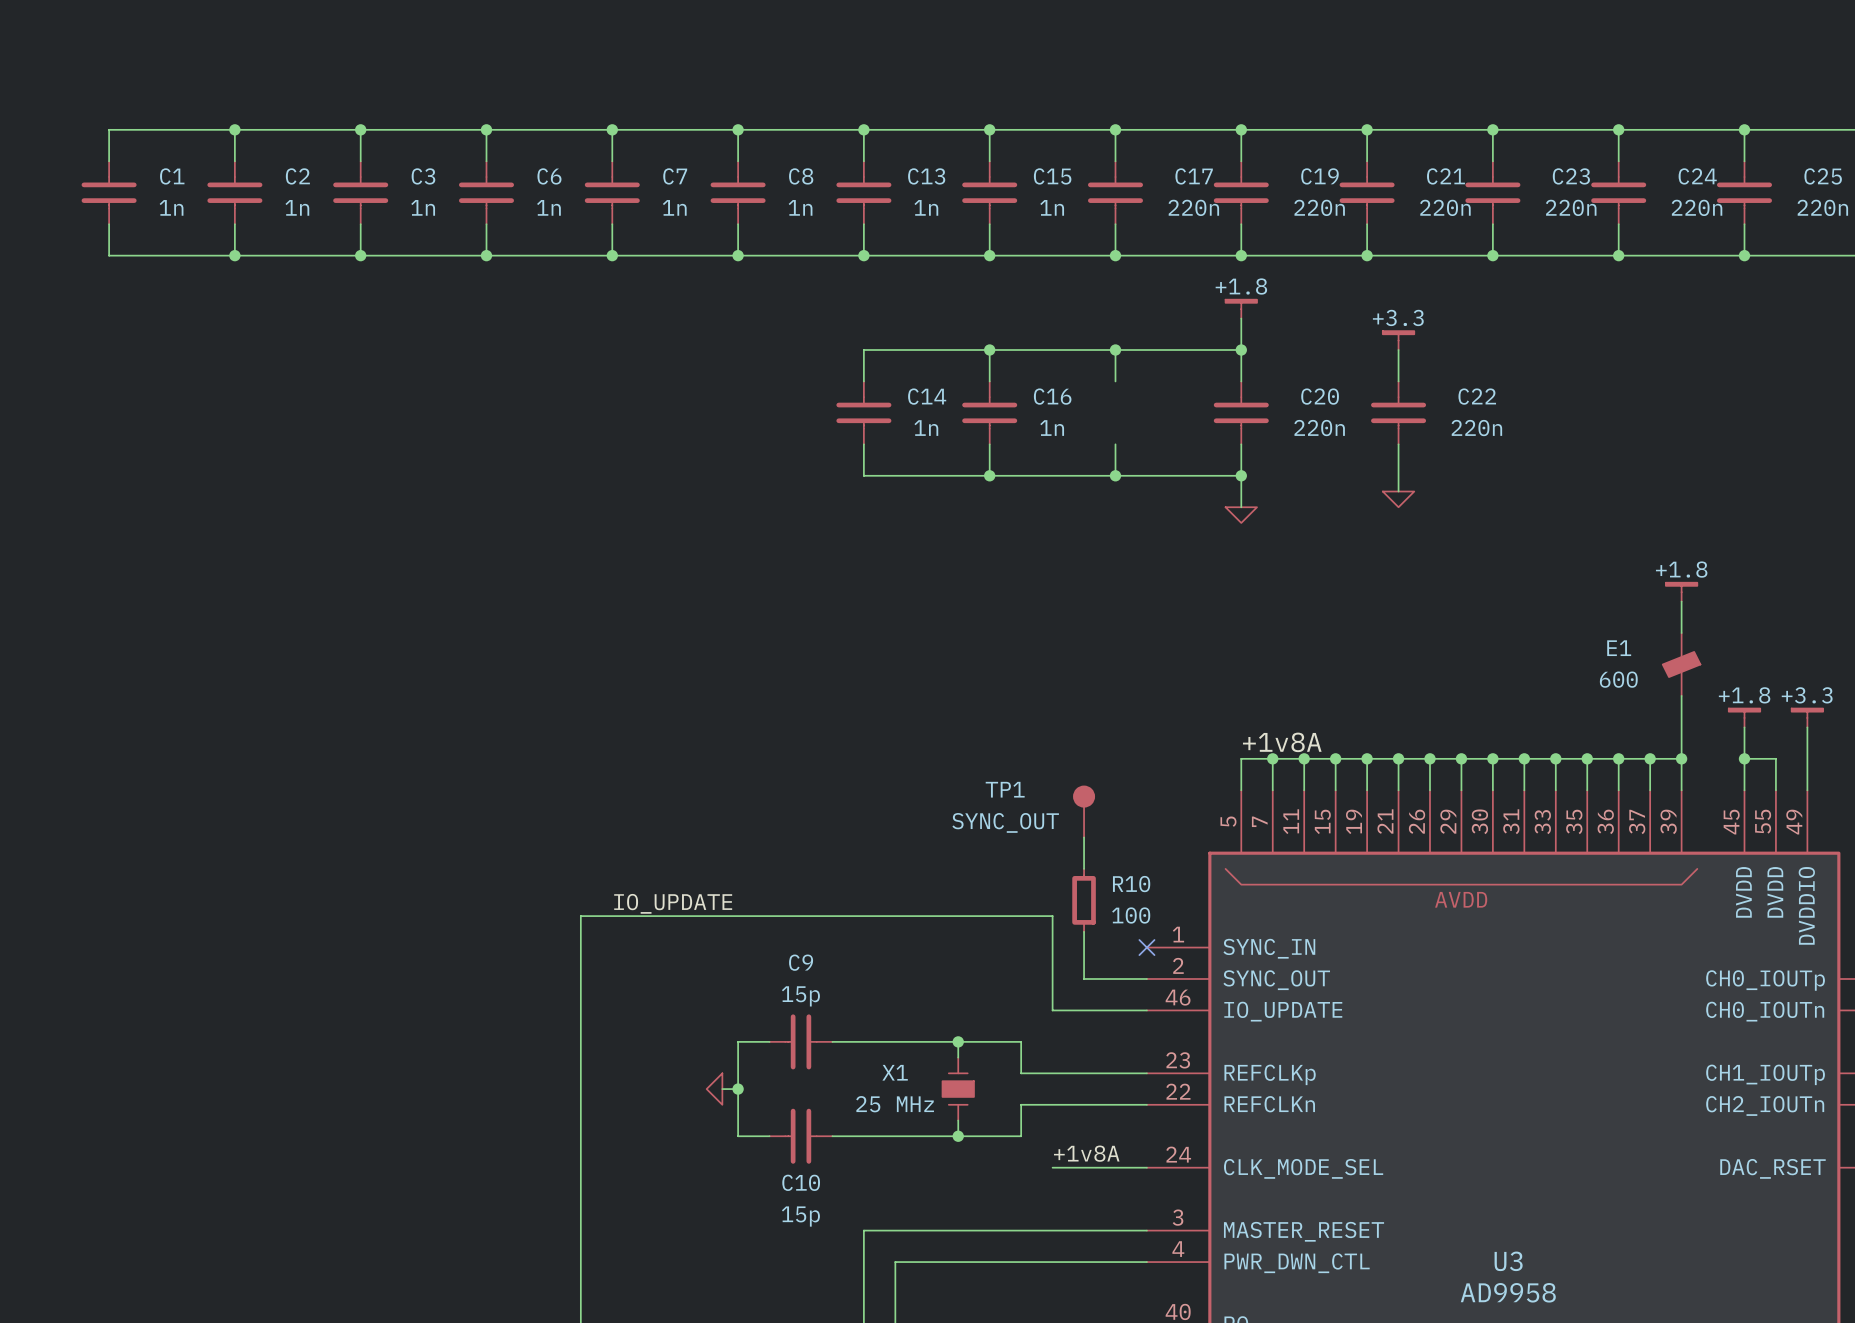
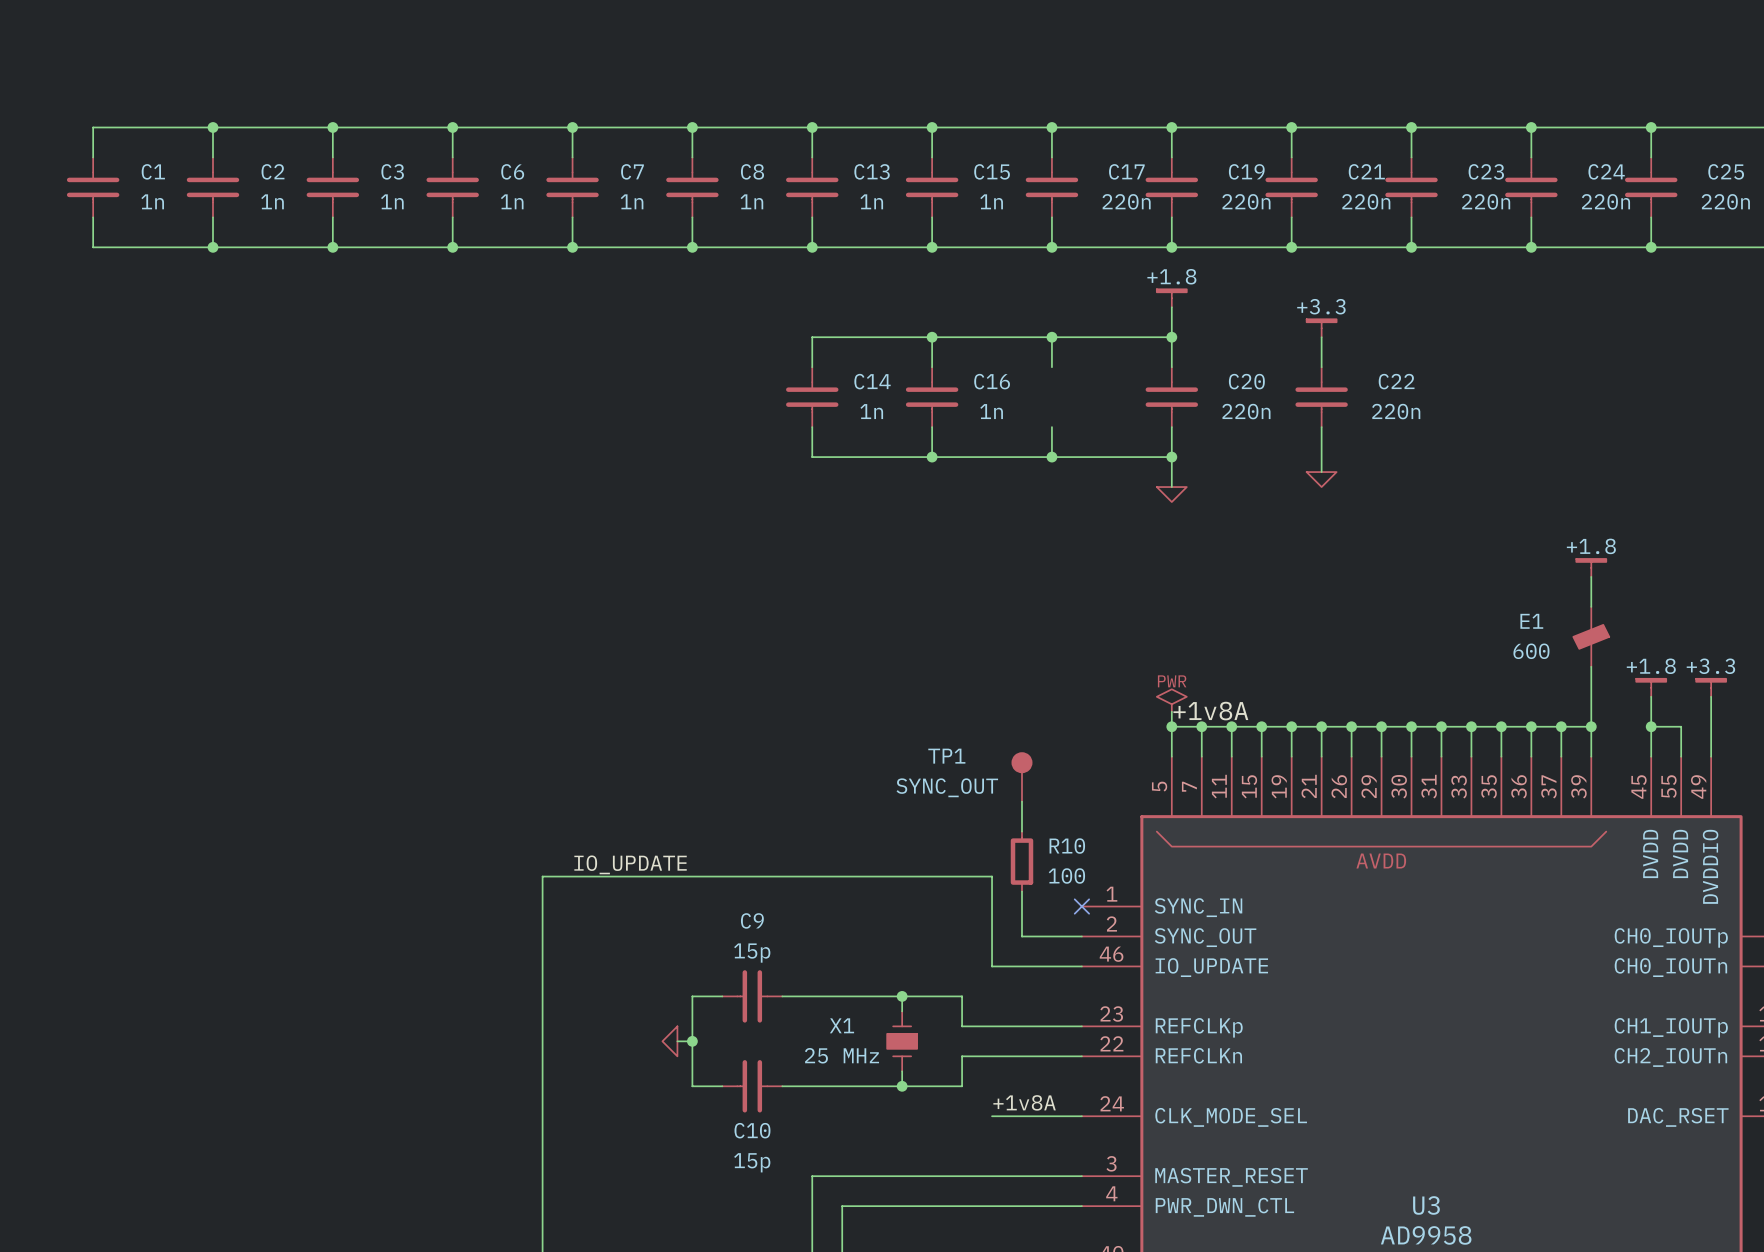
power symbol: none -> (1171, 700)
wire: none -> (1171, 711) (1171, 726)
junction: none -> (1171, 726)

